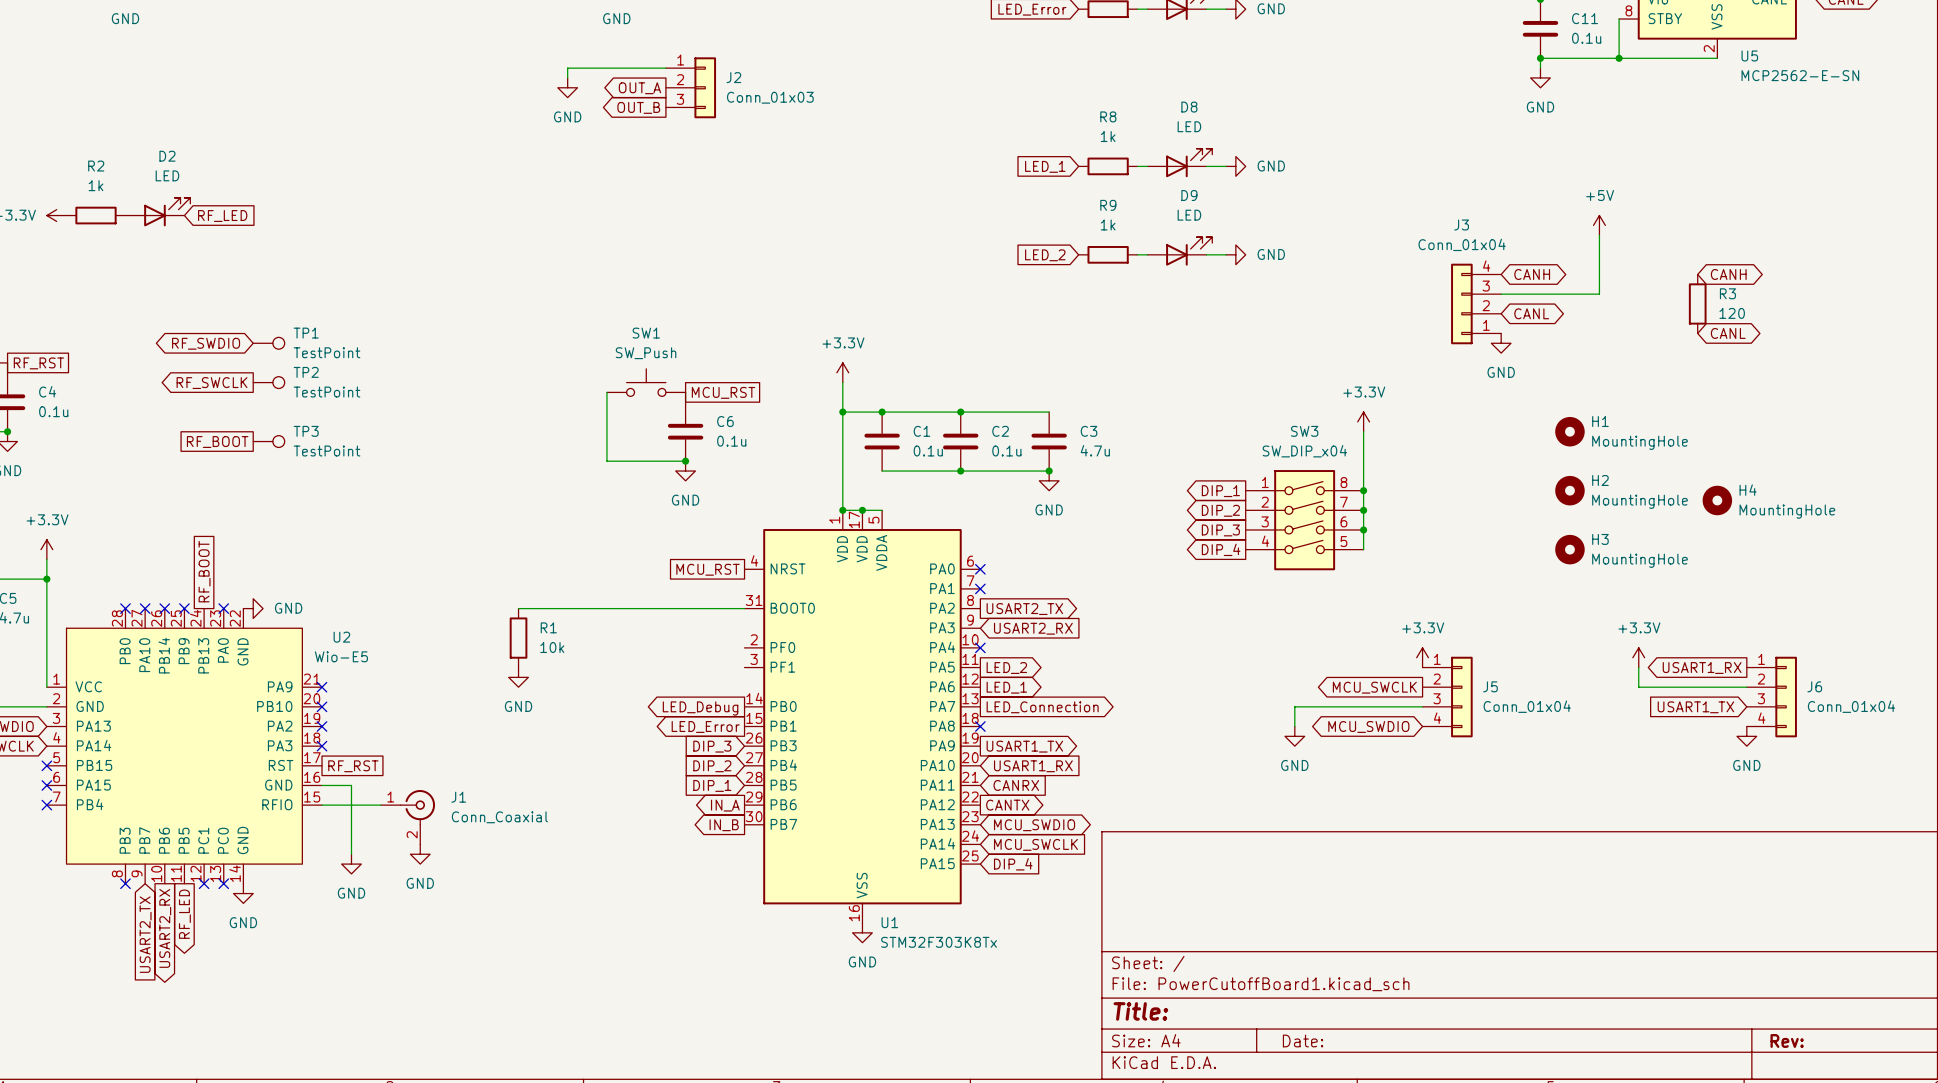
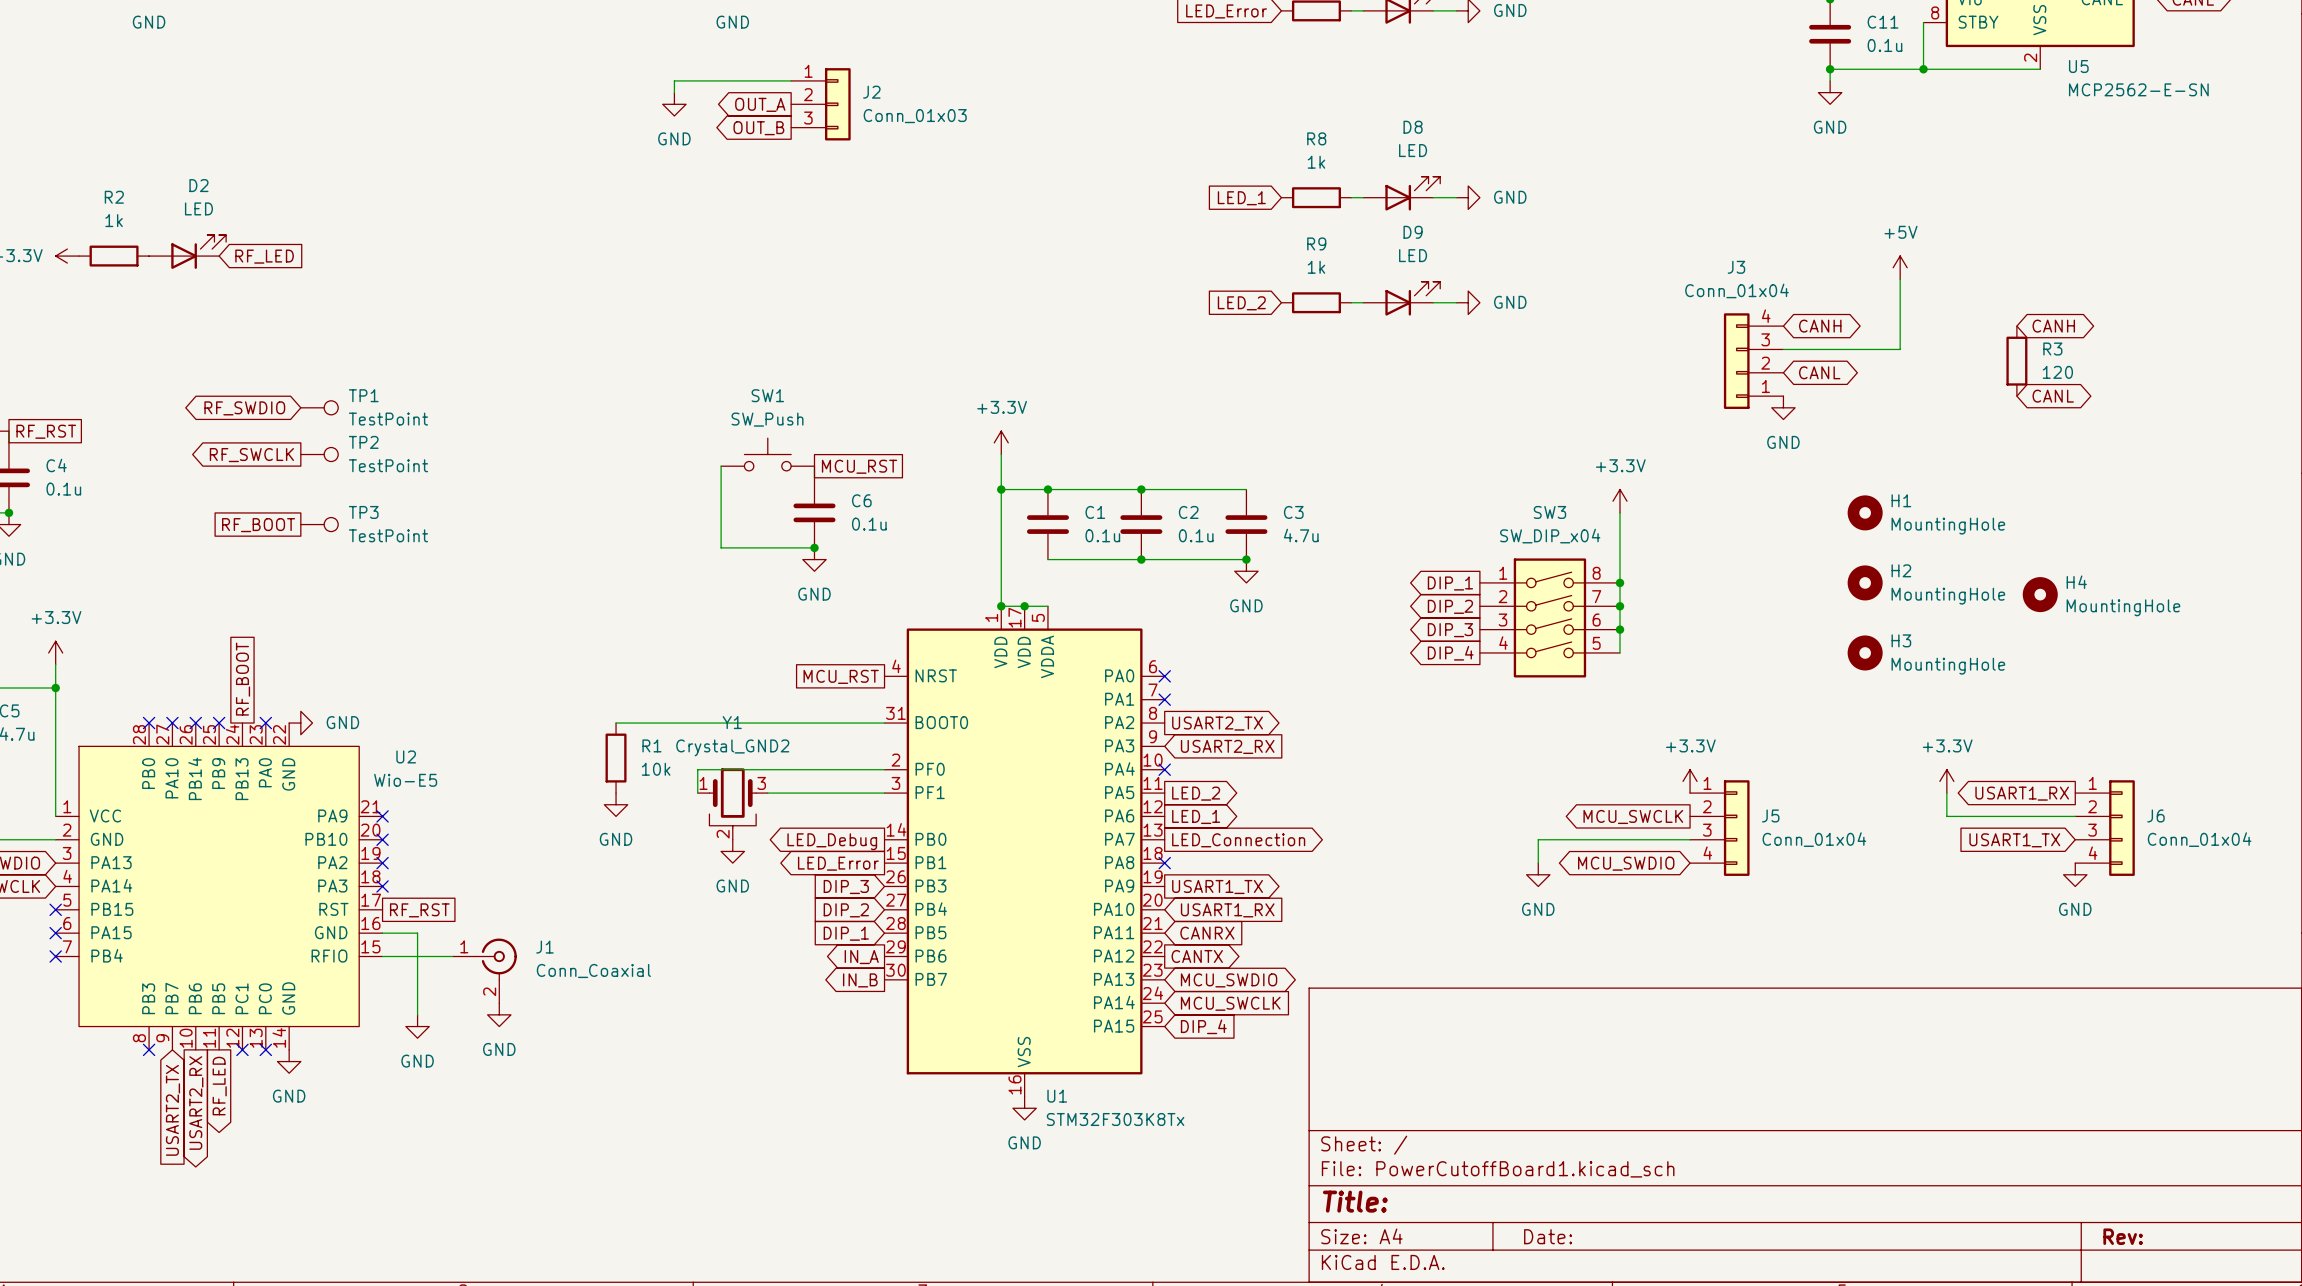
wire: none -> (884, 769) (697, 769) (697, 793)
wire: none -> (767, 793) (884, 793)
Y1: none -> Crystal_GND2 (732, 804)
power symbol: none -> GND (732, 851)

